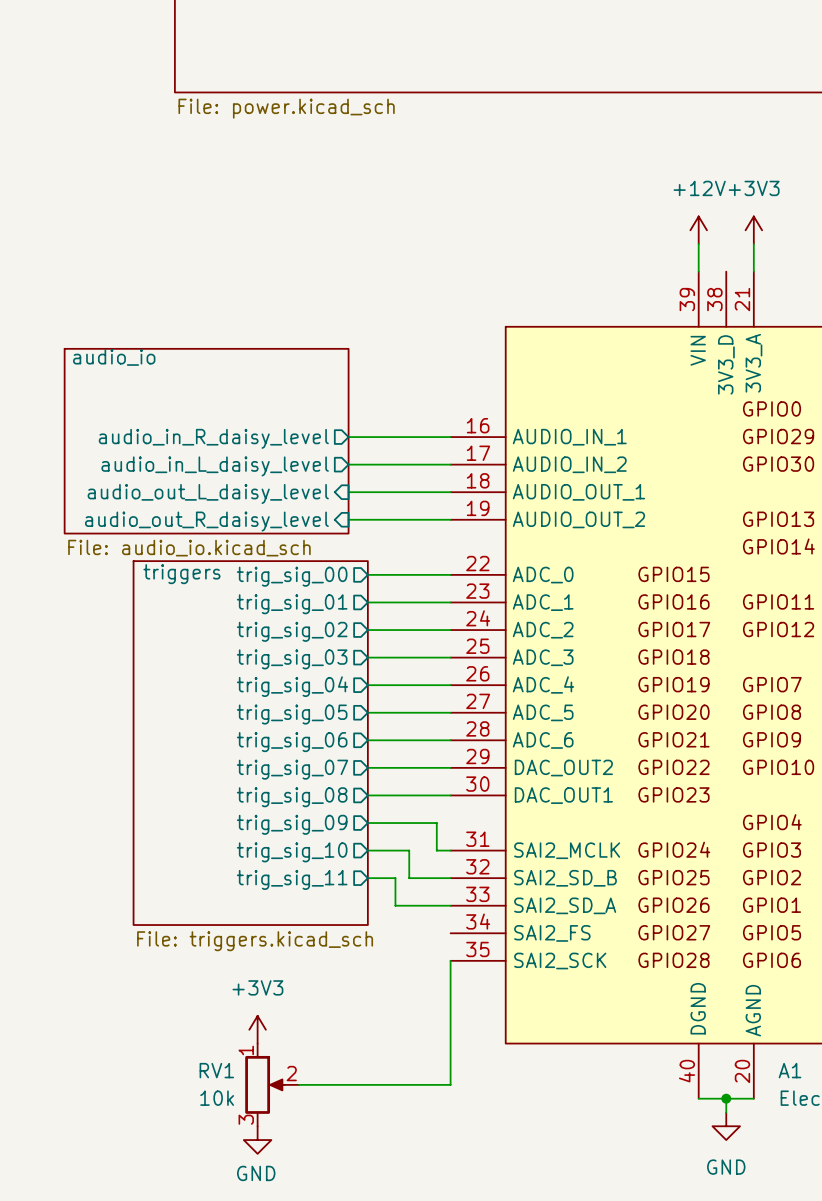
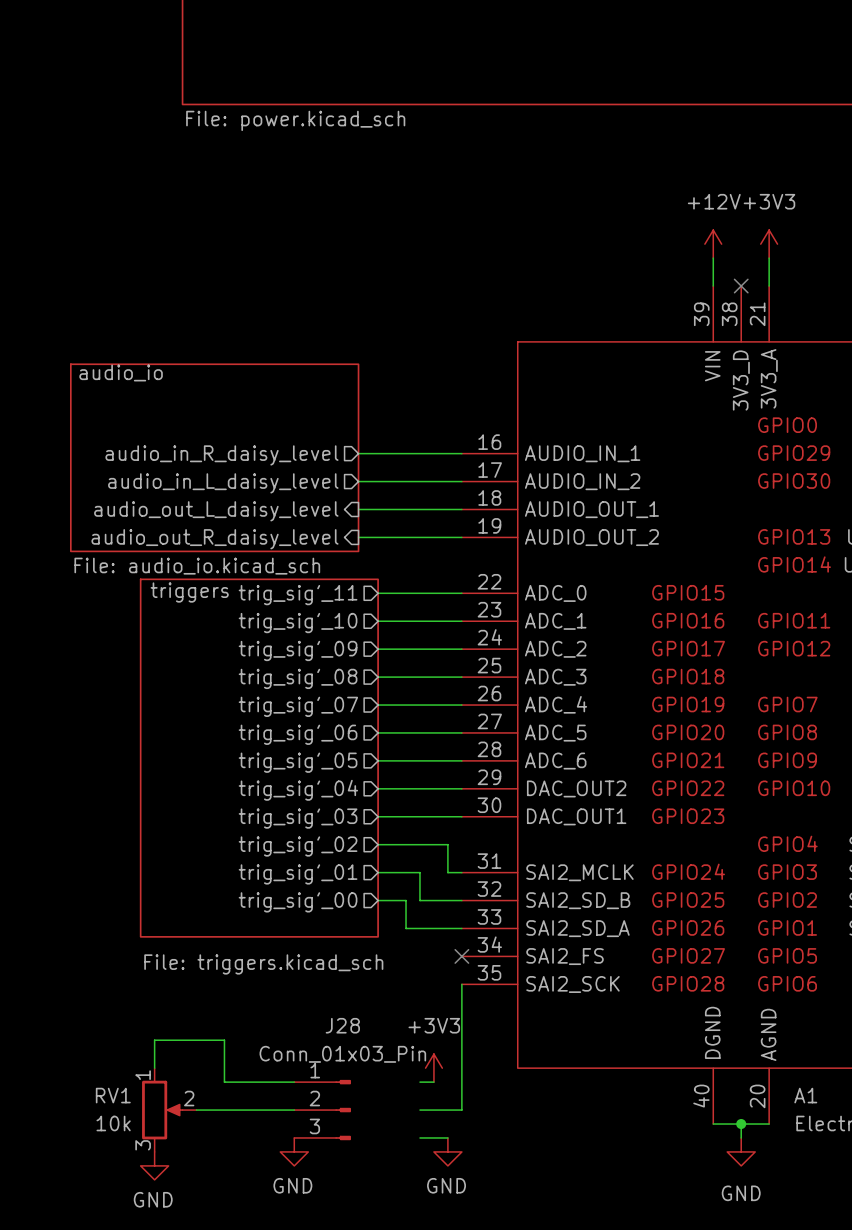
no-connect mark: none -> (741, 286)
sheet triggers shape: [132, 560, 369, 926] -> [139, 578, 379, 938]
sheet pin: trig_sig_00 (292, 576) -> trig_sig'_11 (298, 595)
sheet pin: trig_sig_01 (292, 604) -> trig_sig'_10 (298, 623)
sheet pin: trig_sig_02 (292, 631) -> trig_sig'_09 (298, 650)
sheet pin: trig_sig_03 (292, 659) -> trig_sig'_08 (298, 678)
sheet pin: trig_sig_04 (292, 686) -> trig_sig'_07 (298, 706)
sheet pin: trig_sig_05 (292, 714) -> trig_sig'_06 (298, 734)
sheet pin: trig_sig_06 (292, 742) -> trig_sig'_05 (298, 762)
sheet pin: trig_sig_07 (292, 769) -> trig_sig'_04 (298, 790)
sheet pin: trig_sig_08 (292, 797) -> trig_sig'_03 (298, 818)
sheet pin: trig_sig_09 (292, 824) -> trig_sig'_02 (298, 846)
sheet pin: trig_sig_10 (292, 852) -> trig_sig'_01 (298, 874)
sheet pin: trig_sig_11 (292, 879) -> trig_sig'_00 (298, 902)
no-connect mark: none -> (461, 956)
power symbol position: +3V3 (257, 1029) -> +3V3 (433, 1068)
wire: none -> (154, 1068) (154, 1040) (224, 1040) (224, 1082) (294, 1082)
wire: none -> (419, 1082) (433, 1082)
wire: none -> (196, 1110) (294, 1110)
RV1 position: (272, 1084) -> (169, 1110)
wire: (298, 1084) (409, 1084) -> none
J28: none -> Conn_01x03_Pin (322, 1110)
wire: none -> (419, 1137) (447, 1137)
power symbol: none -> GND (447, 1151)
power symbol: none -> GND (154, 1165)
power symbol position: GND (257, 1140) -> GND (294, 1151)

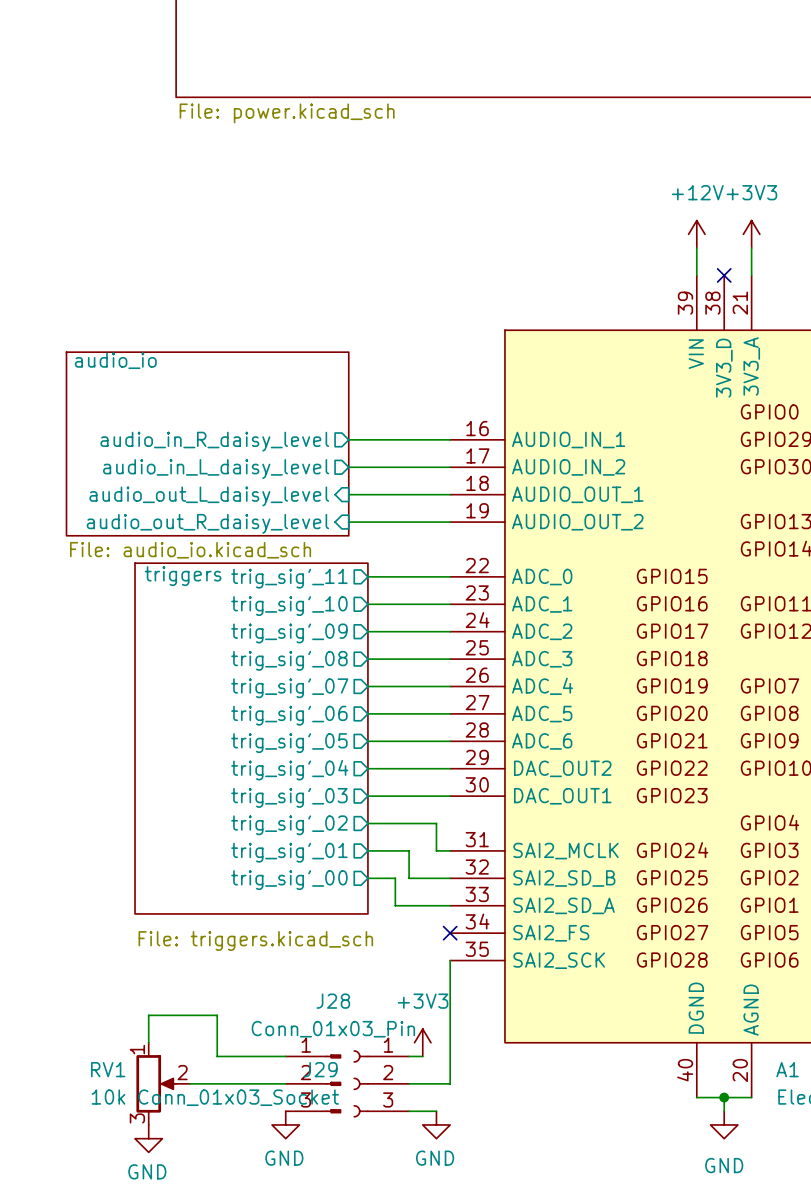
J29: none -> Conn_01x03_Socket (381, 1083)

